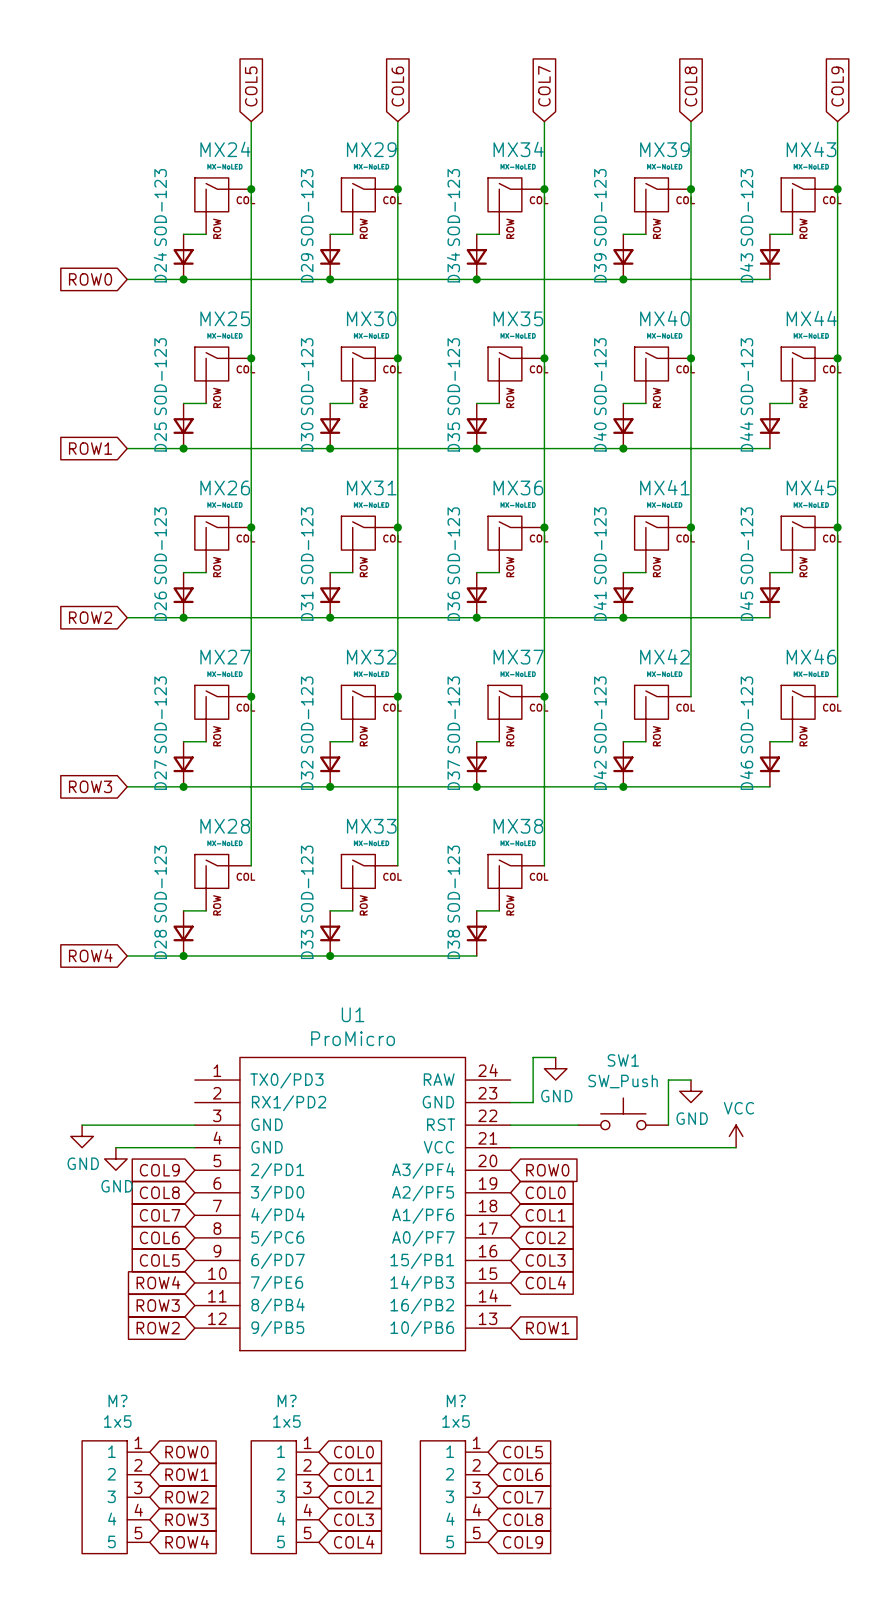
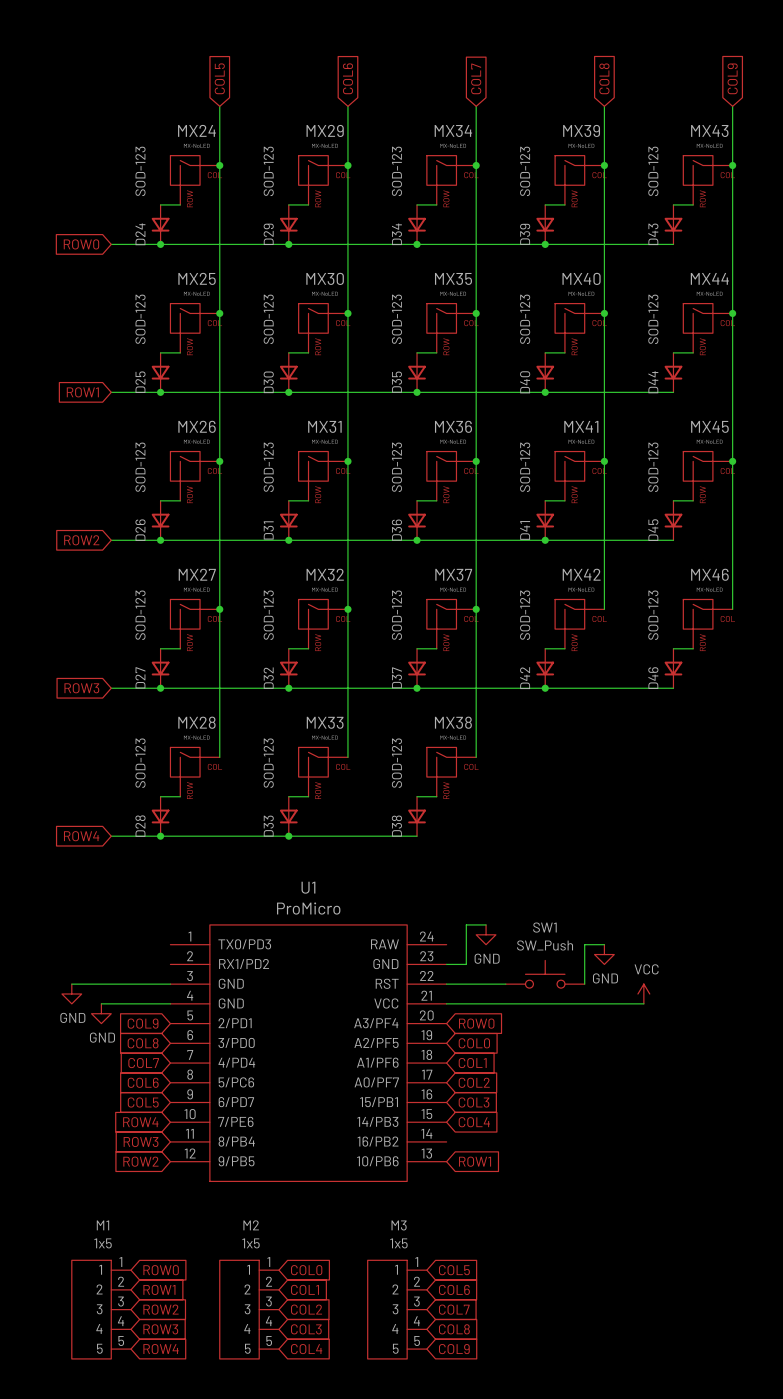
M? name: M? (117, 1400) -> M1 (102, 1225)
M? name: M? (287, 1400) -> M2 (251, 1225)
M? name: M? (456, 1400) -> M3 (399, 1225)

